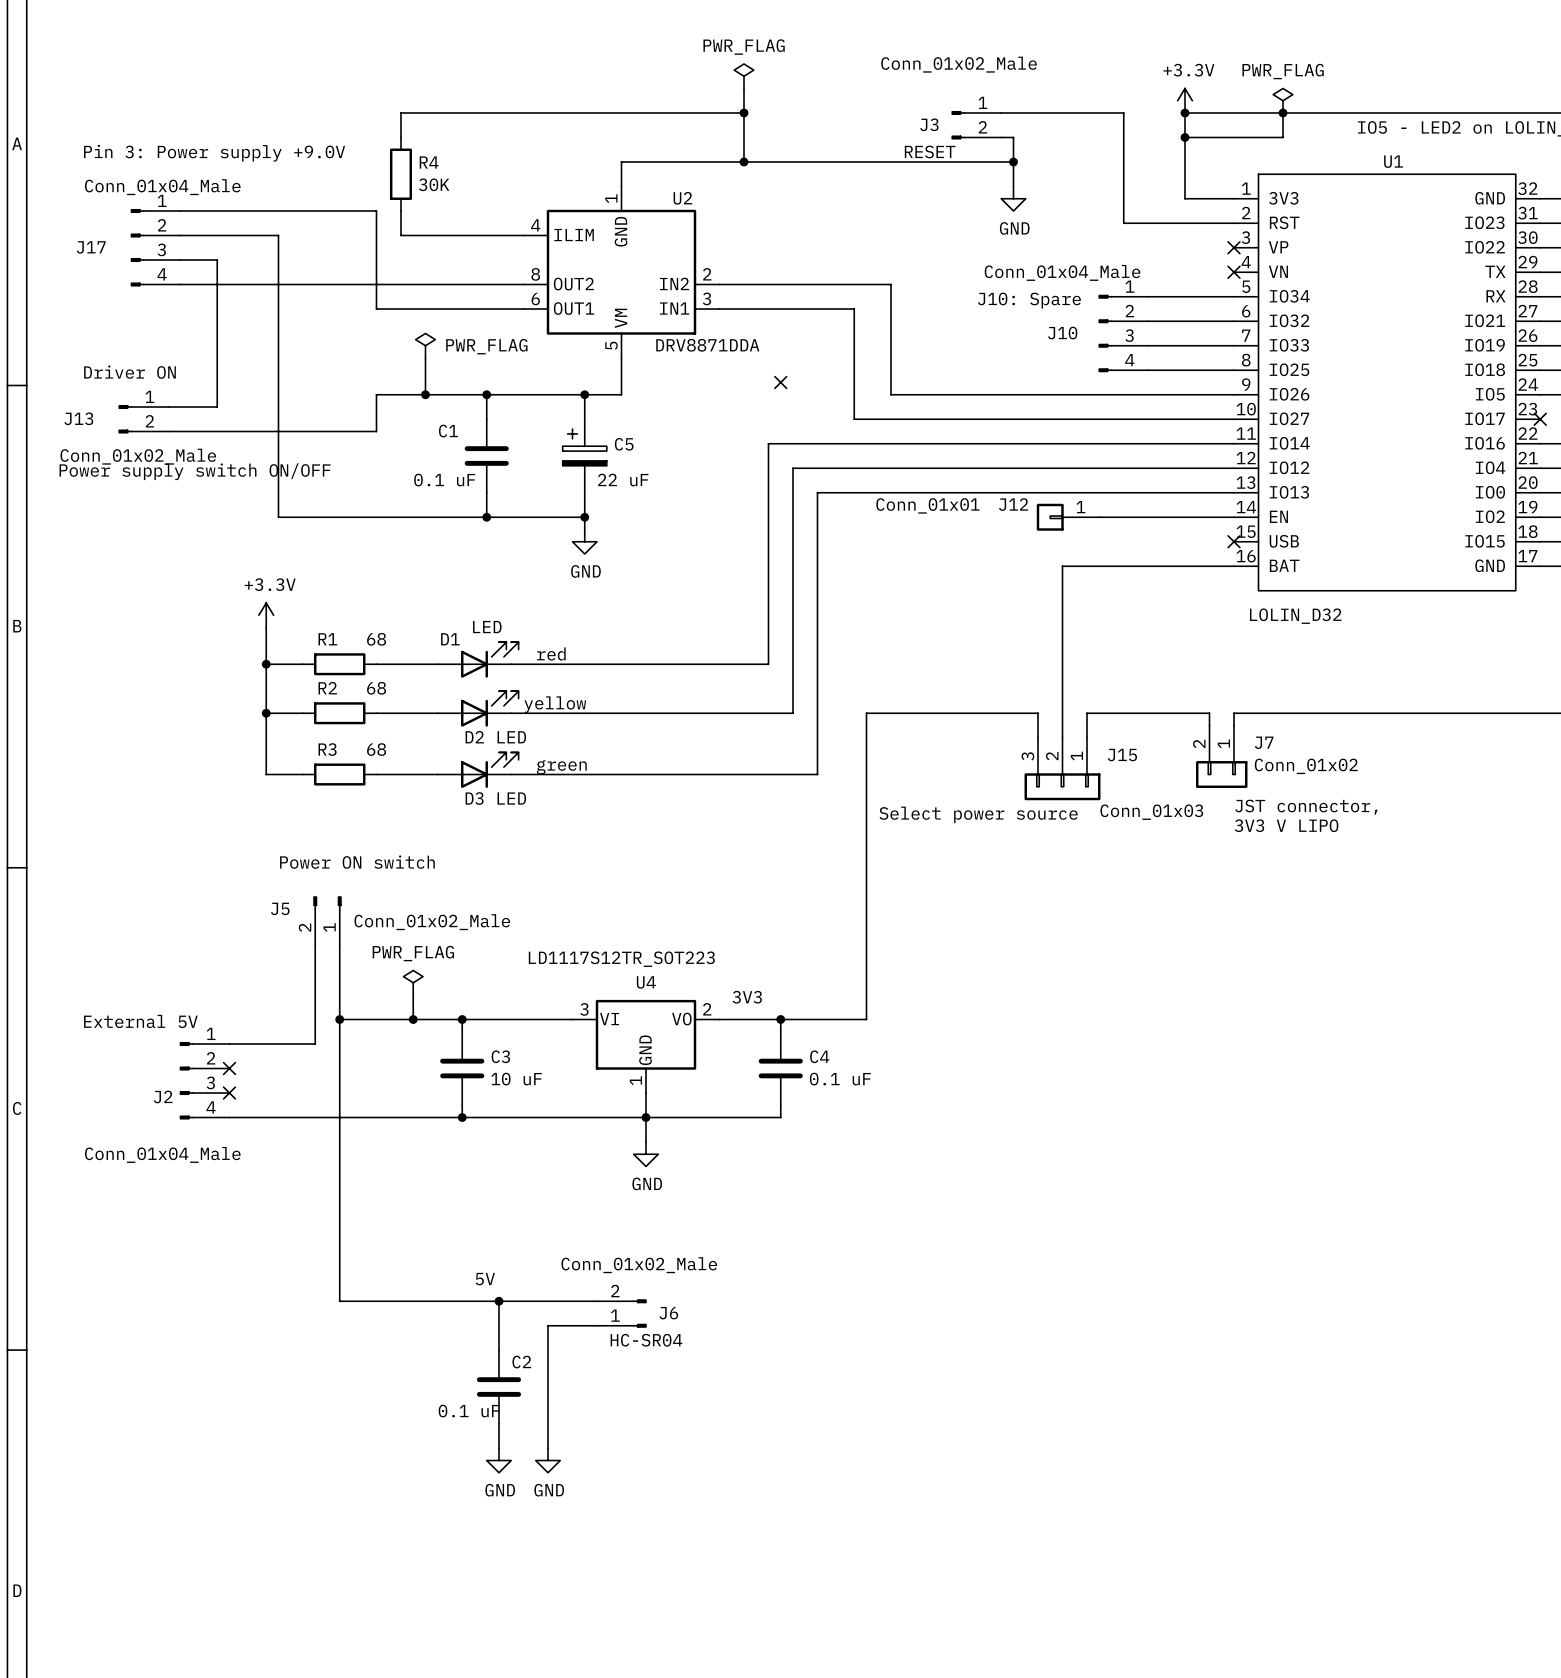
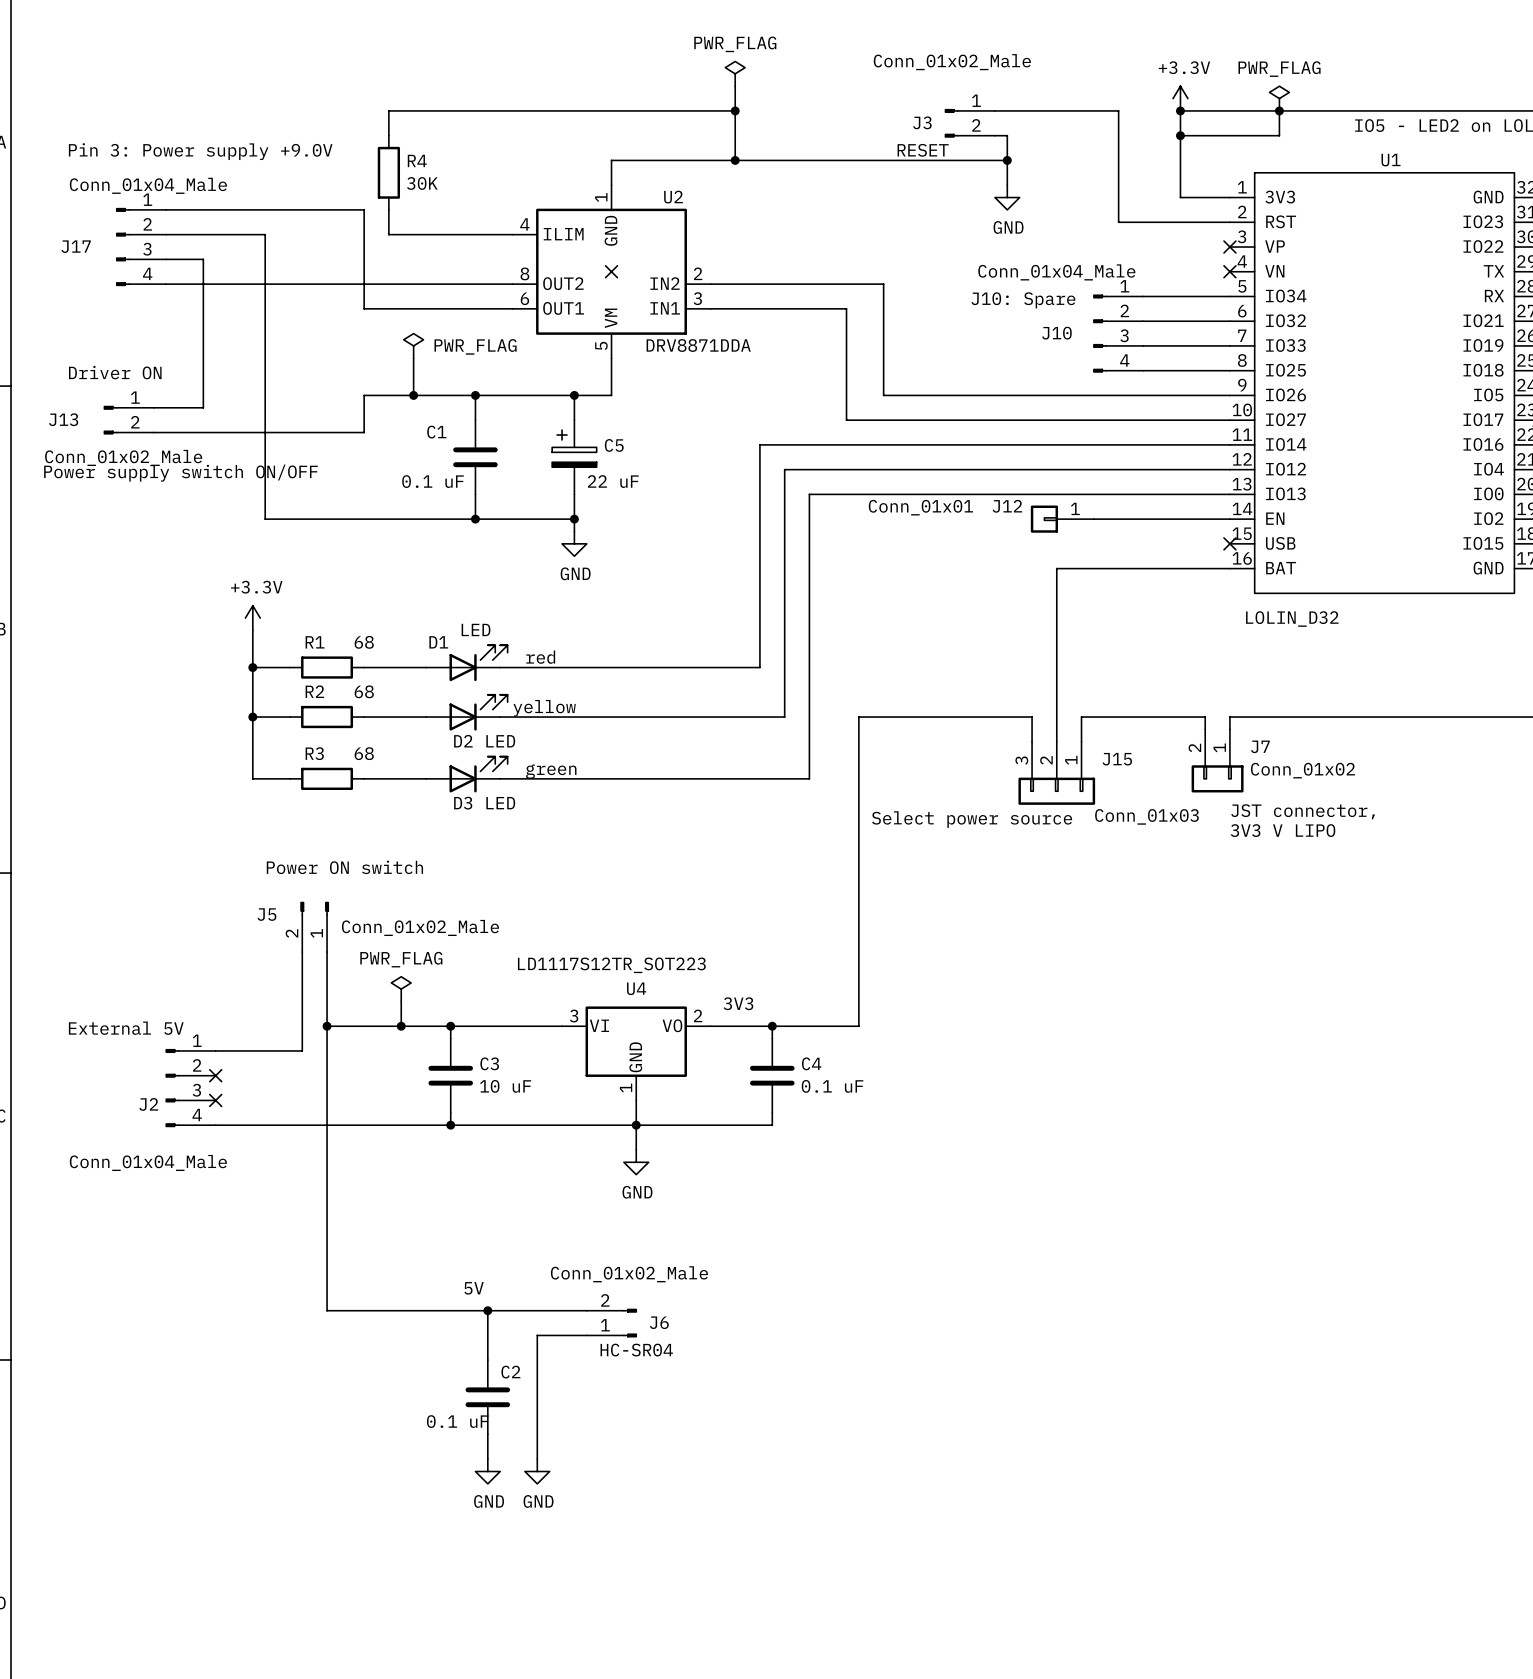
no-connect mark: none -> (611, 271)
no-connect mark: (780, 382) -> none

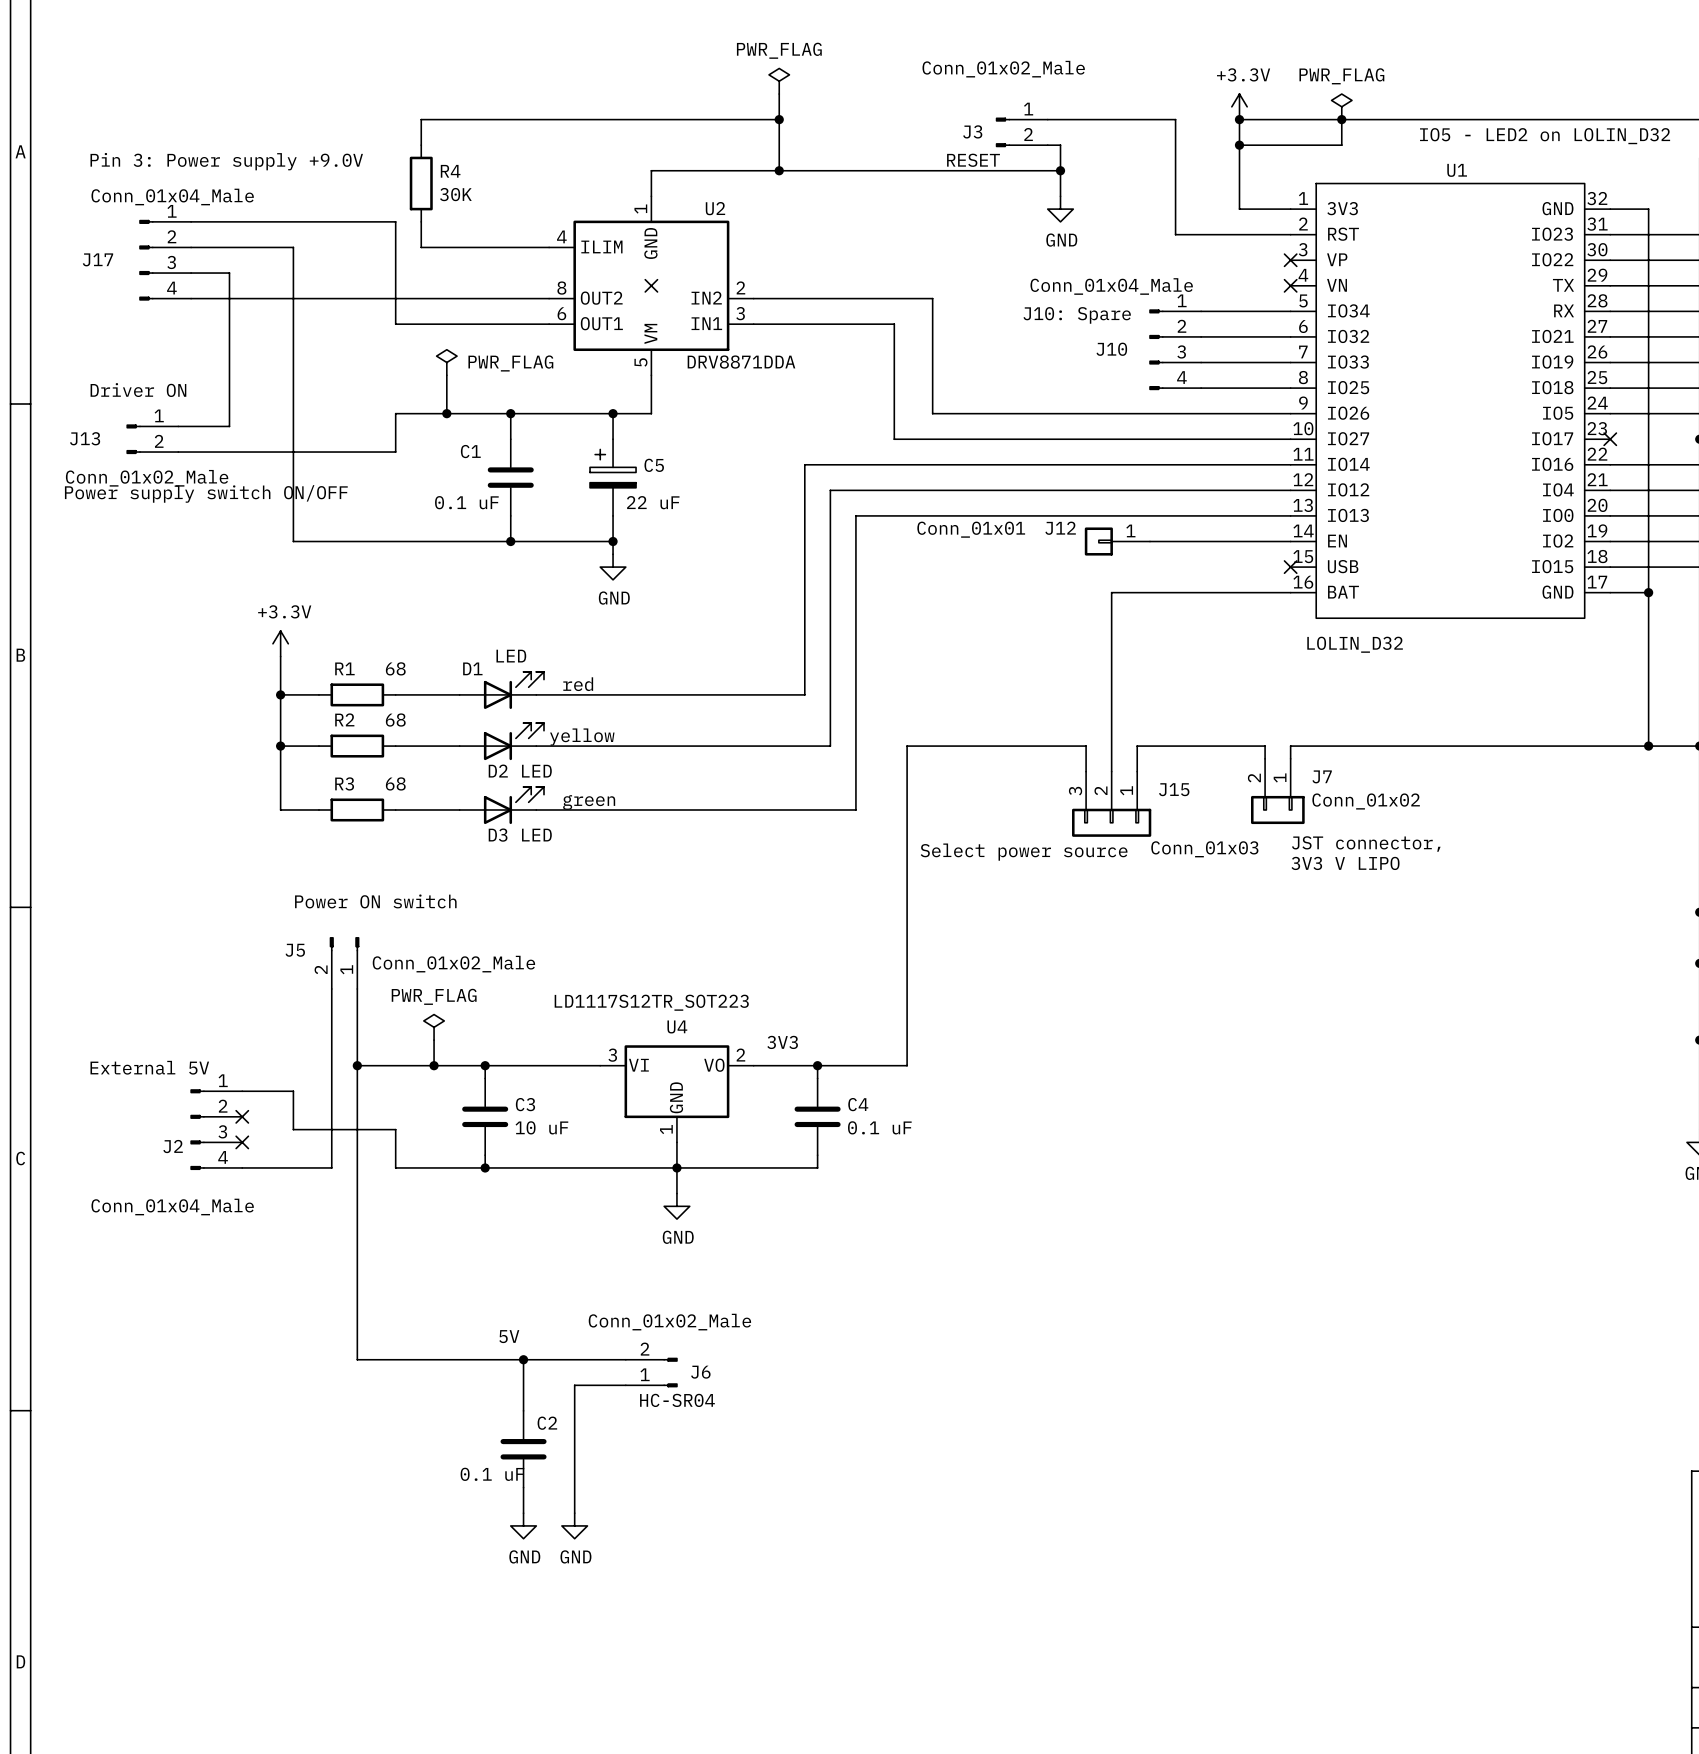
wire: (265, 1050) (302, 1050) -> (331, 1167) (331, 1091)
wire: (302, 1125) (364, 1125) -> (293, 1091) (293, 1129) (395, 1129) (395, 1167)

